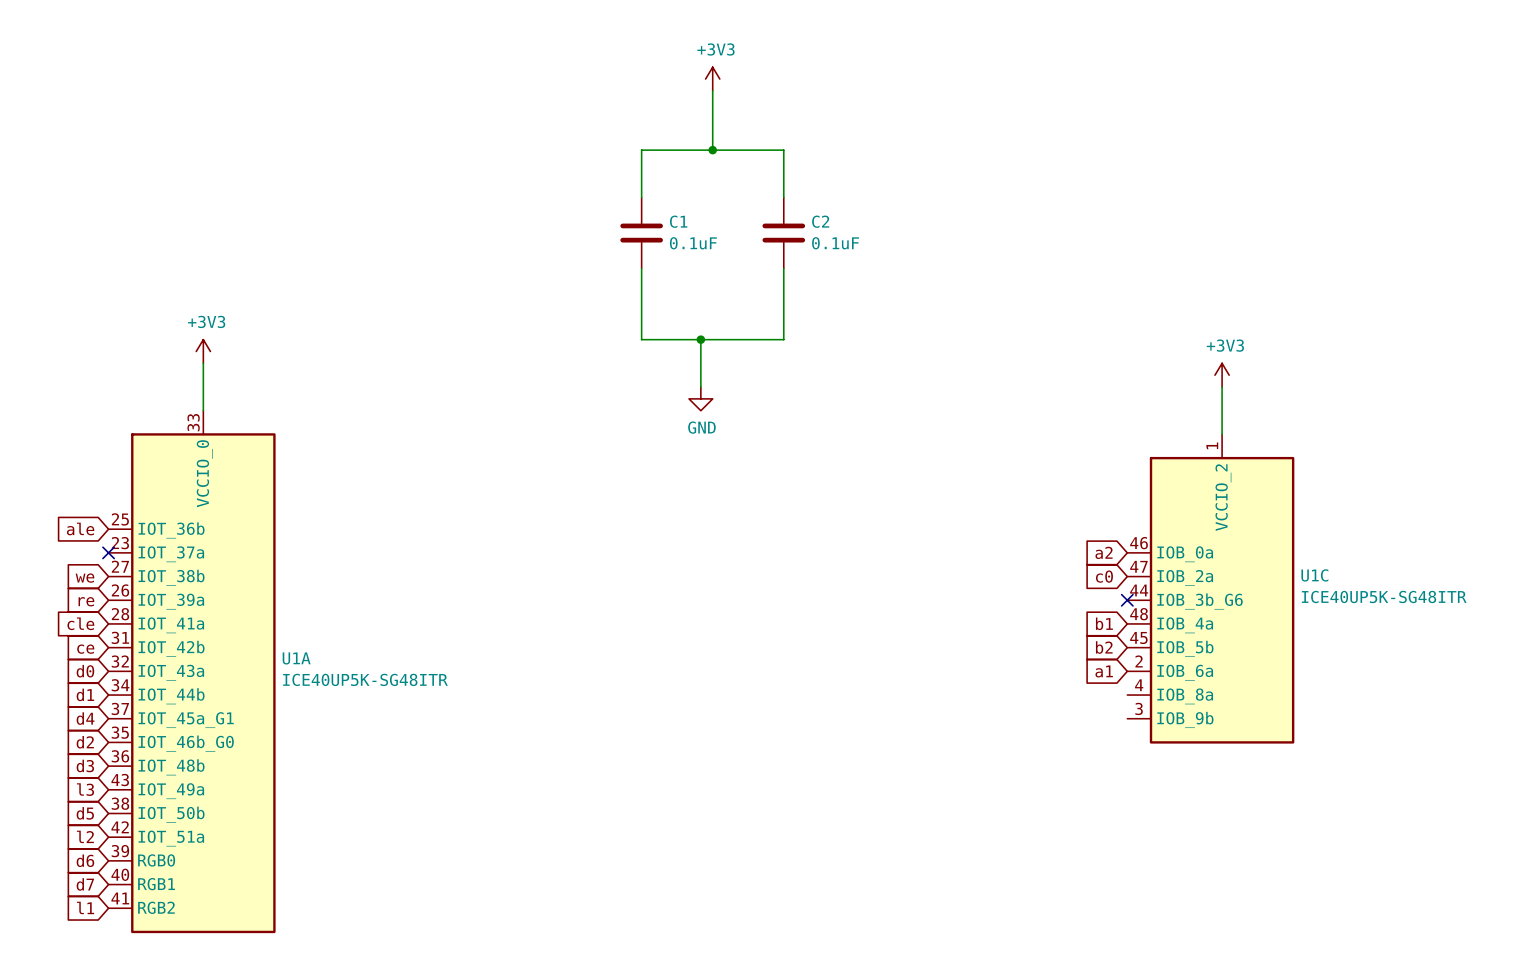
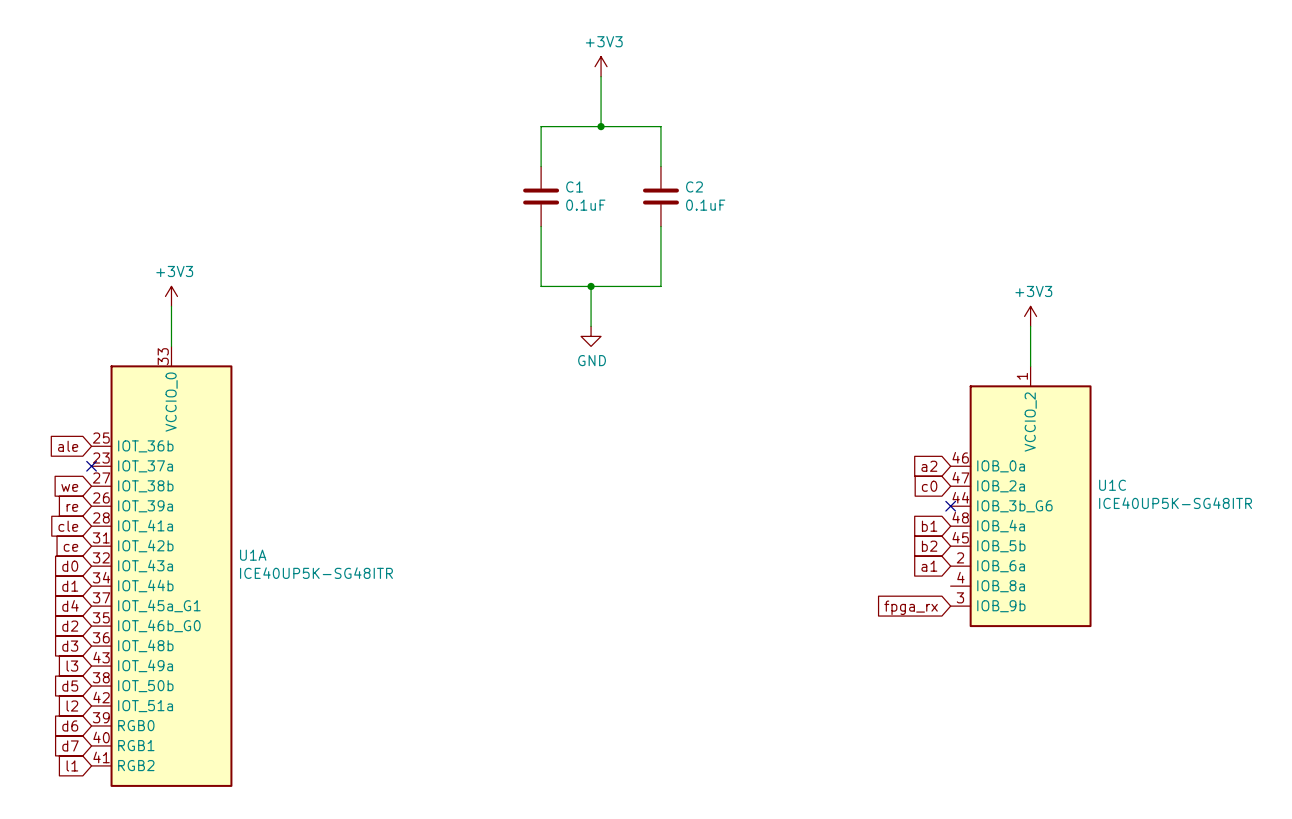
global label: none -> fpga_rx (911, 607)

